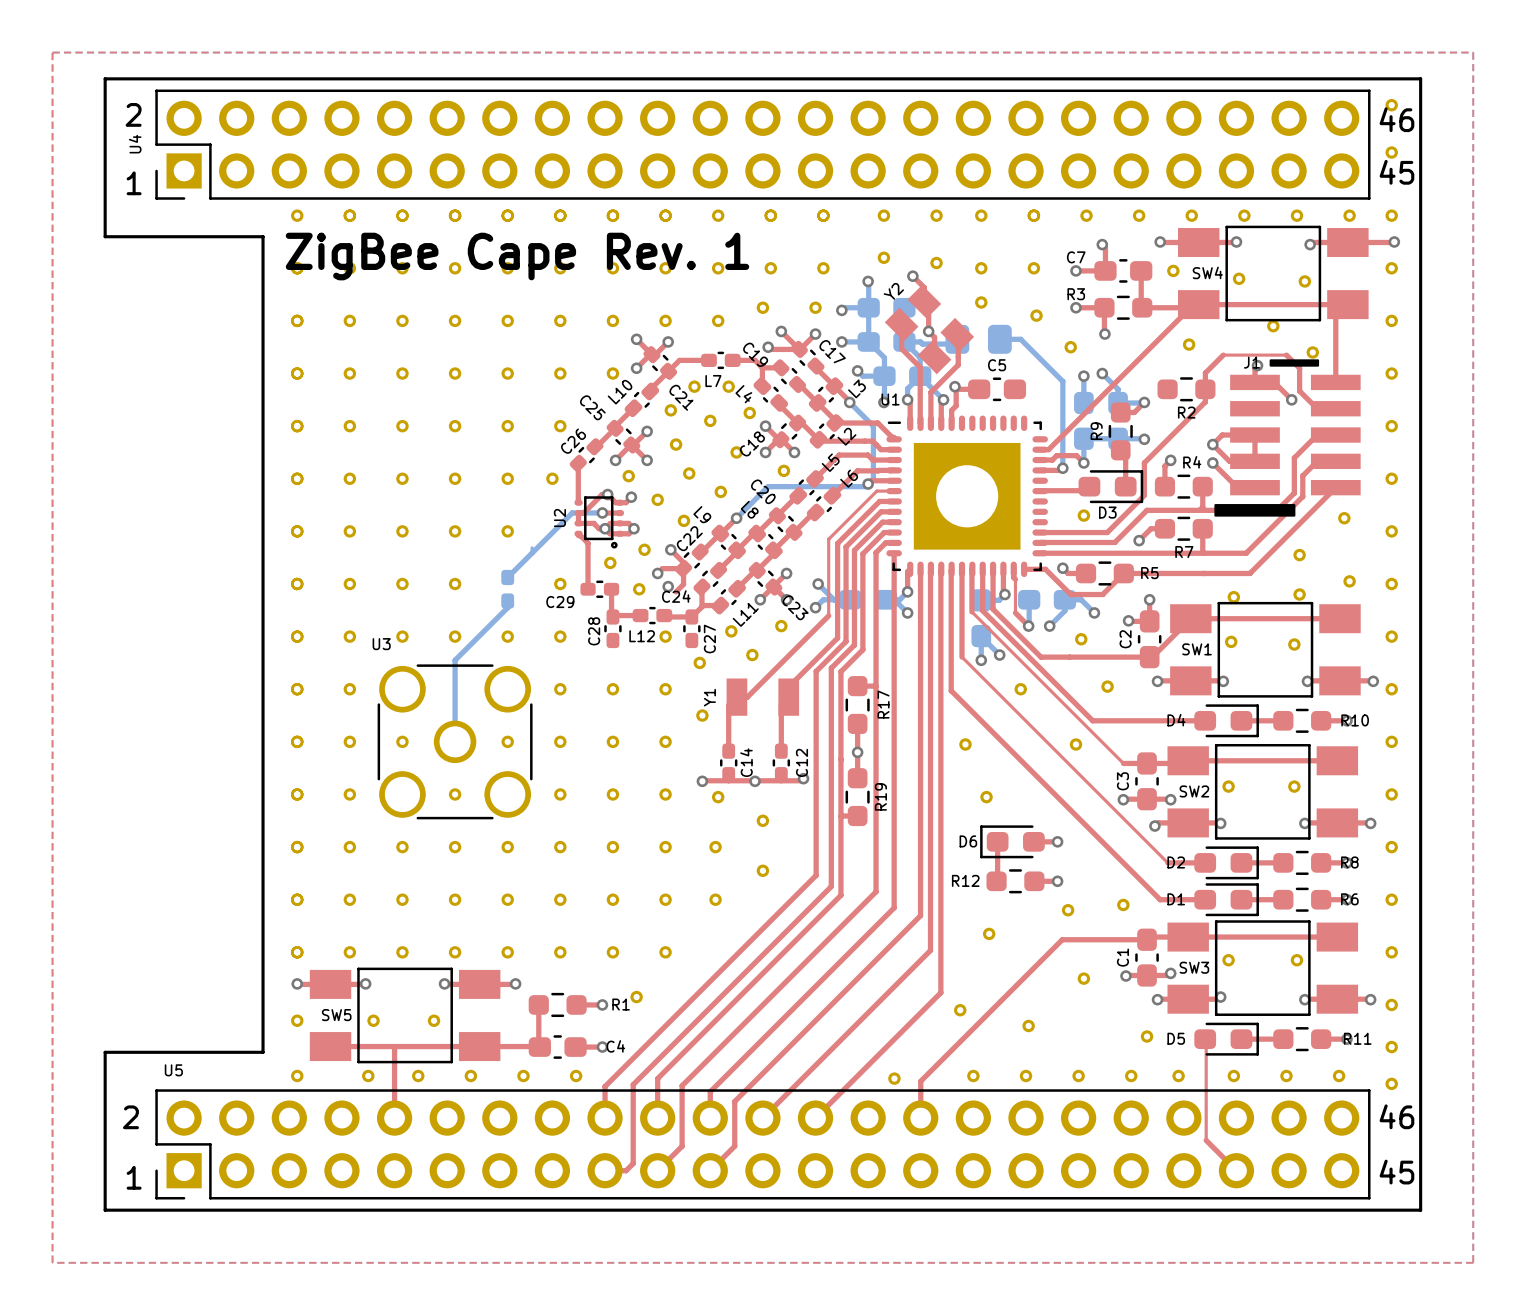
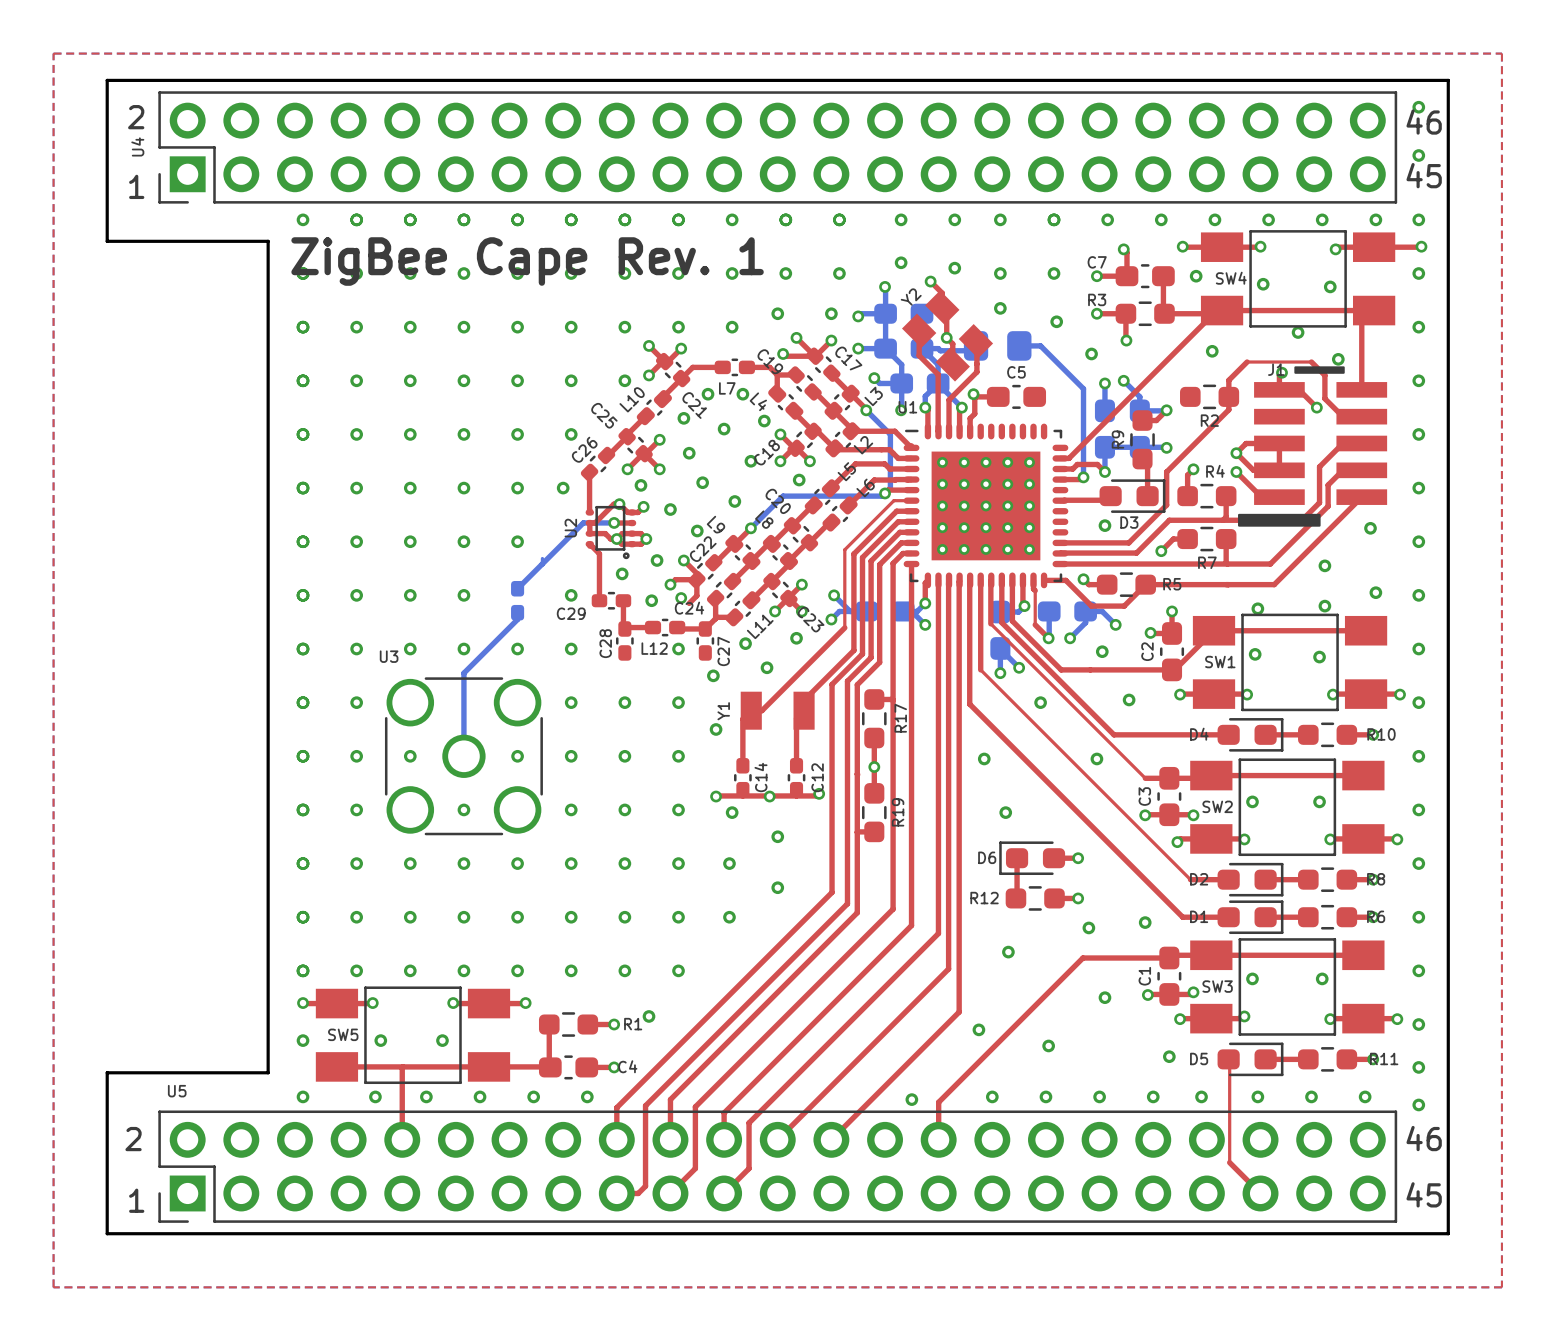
U1 footprint: [886, 415, 1048, 578] -> [903, 423, 1069, 589]

